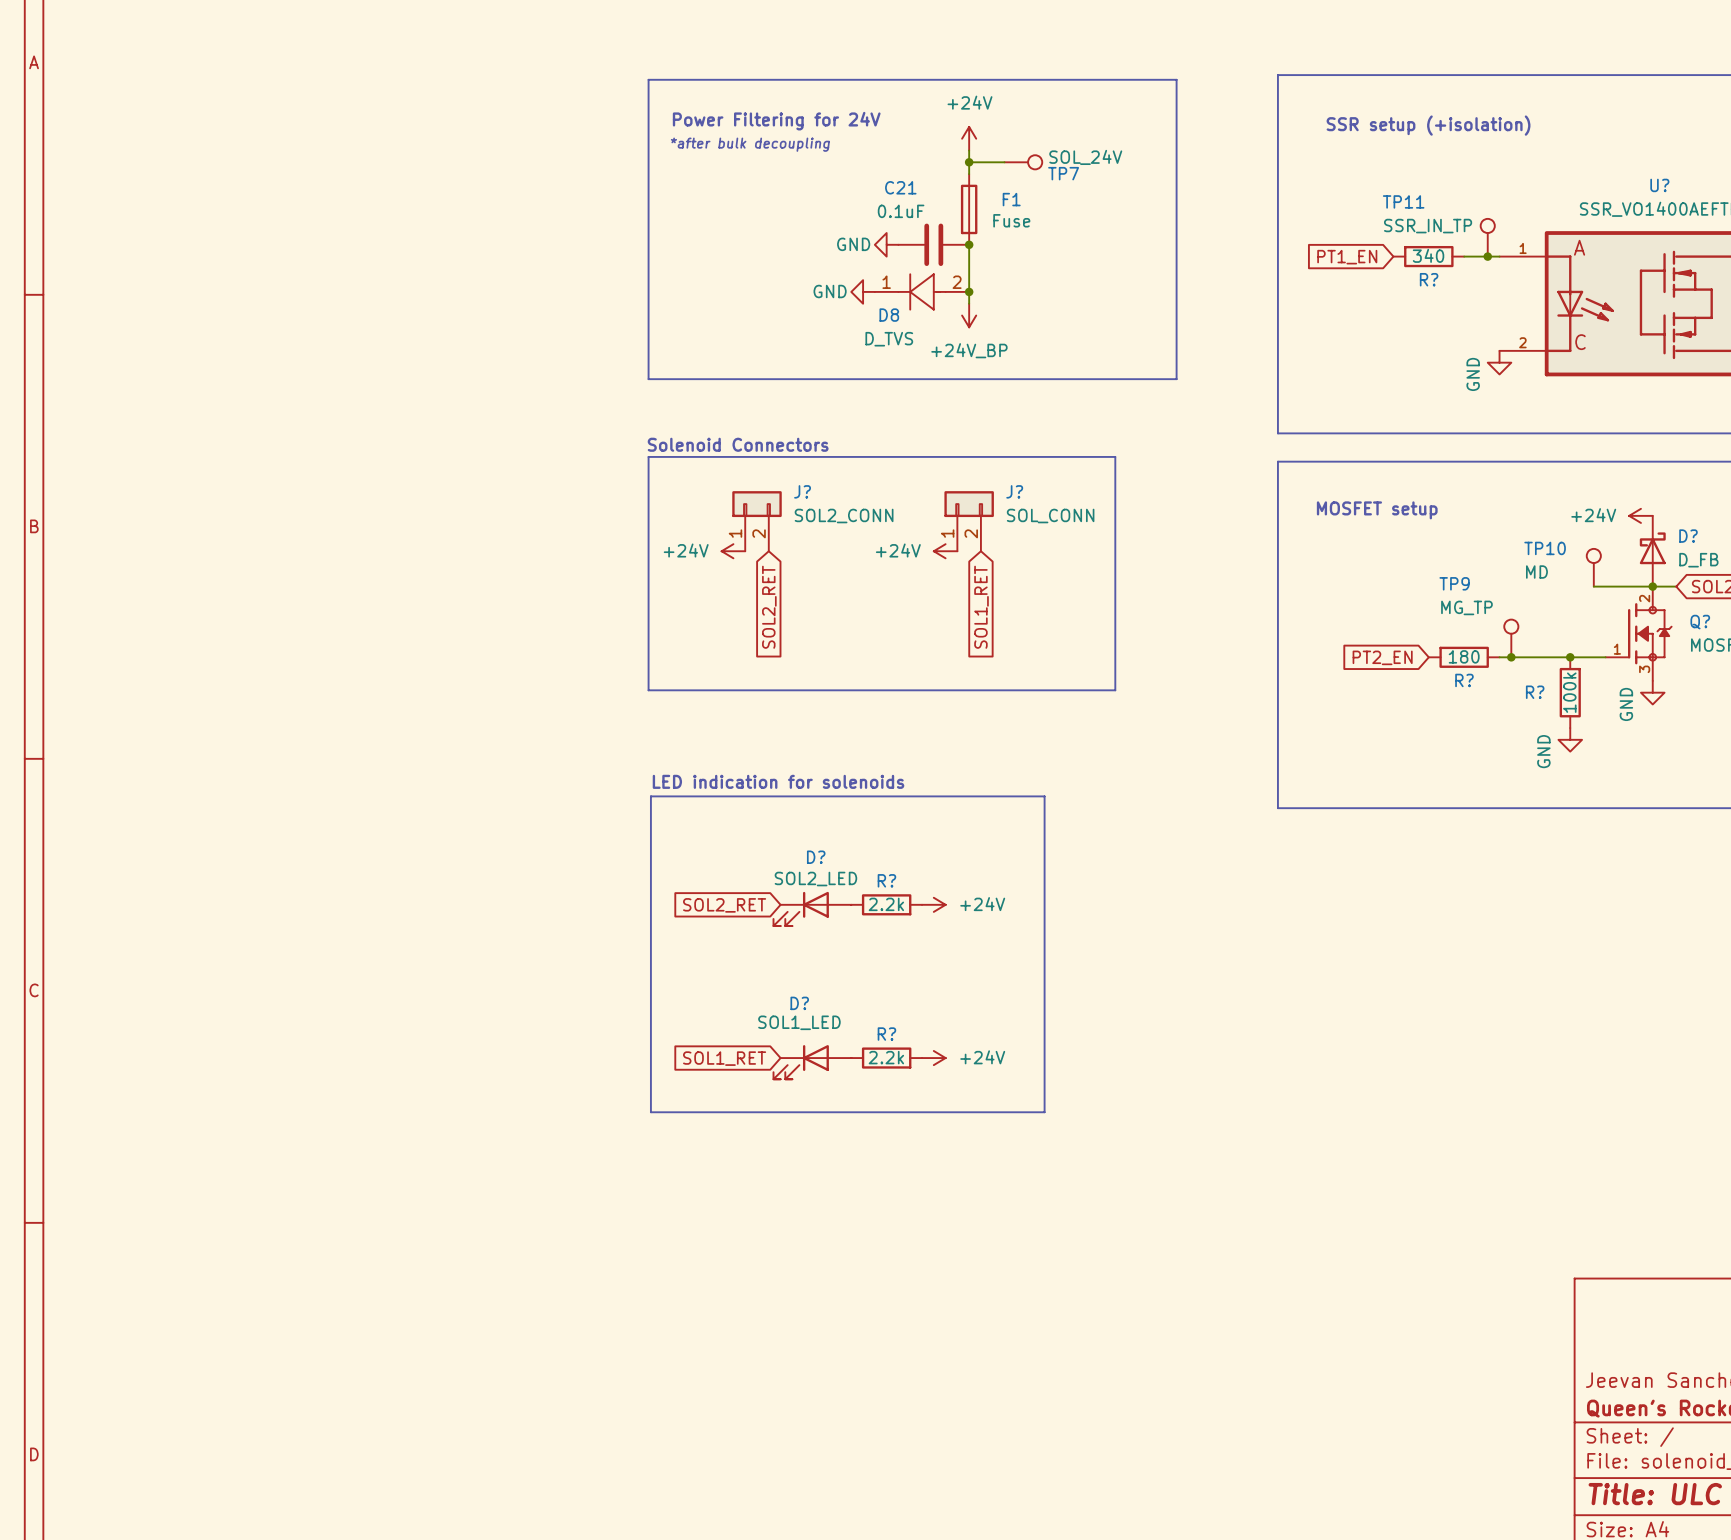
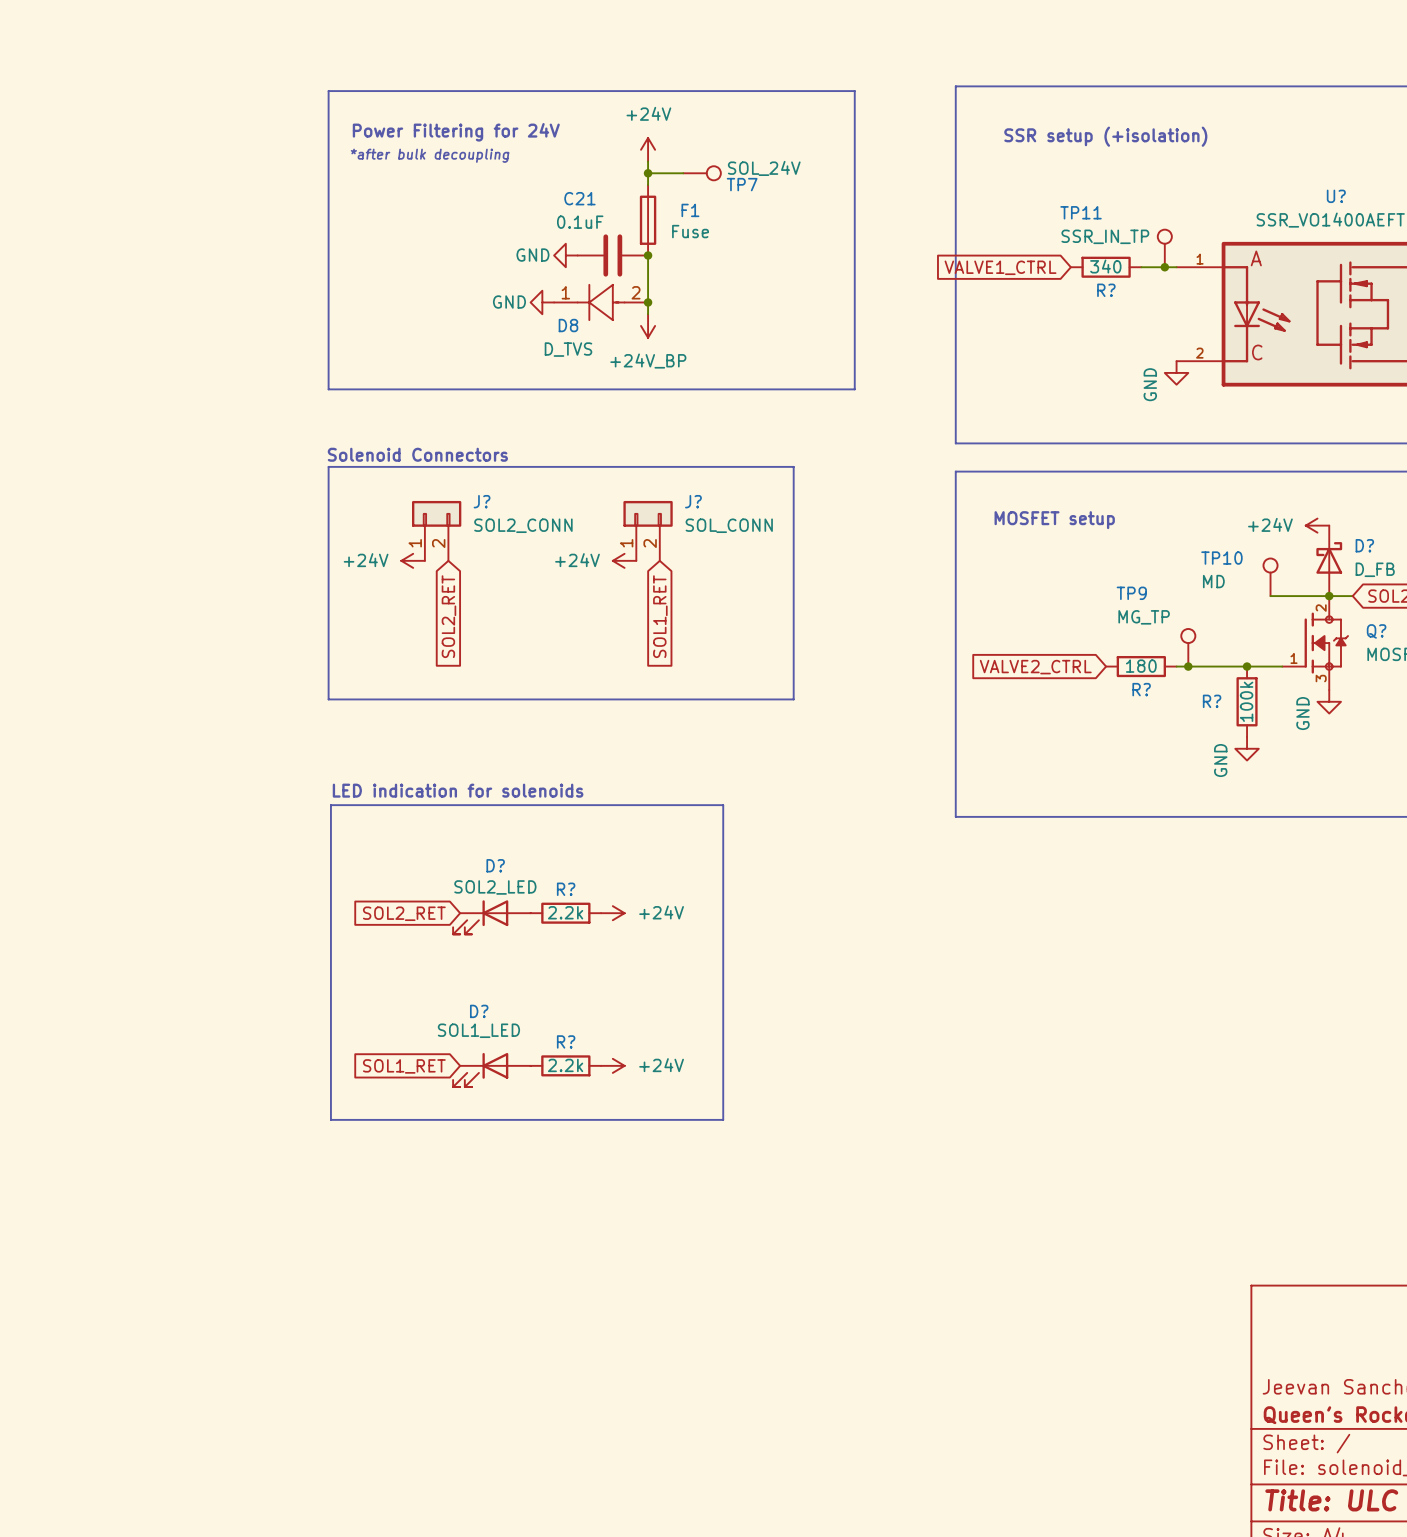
global label: PT1_EN (1347, 257) -> VALVE1_CTRL (1000, 267)
global label: PT2_EN (1382, 657) -> VALVE2_CTRL (1035, 667)

